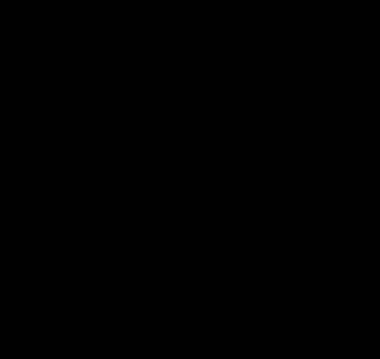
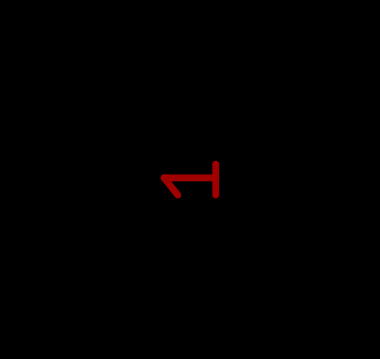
track: none -> (215, 164) (215, 195)
track: none -> (215, 177) (164, 177) (177, 195)

